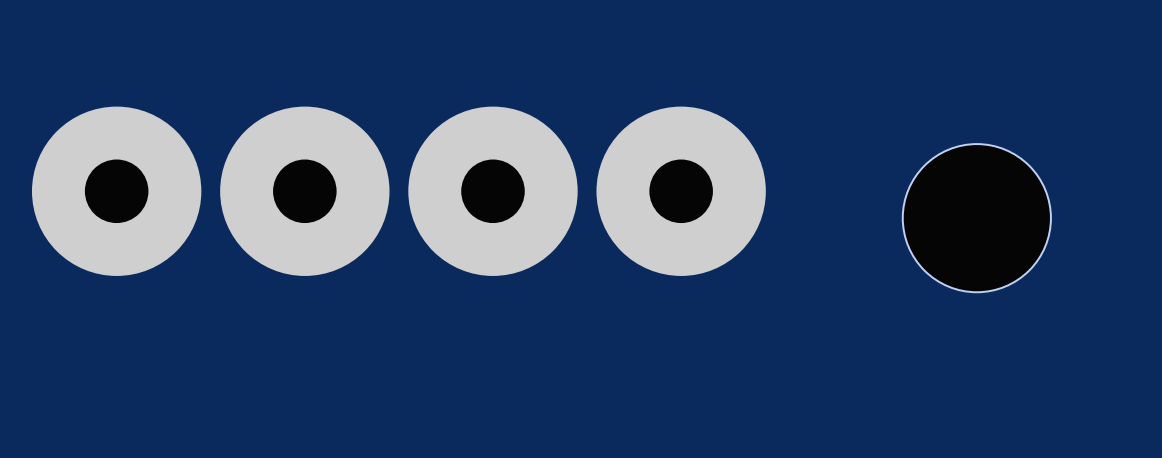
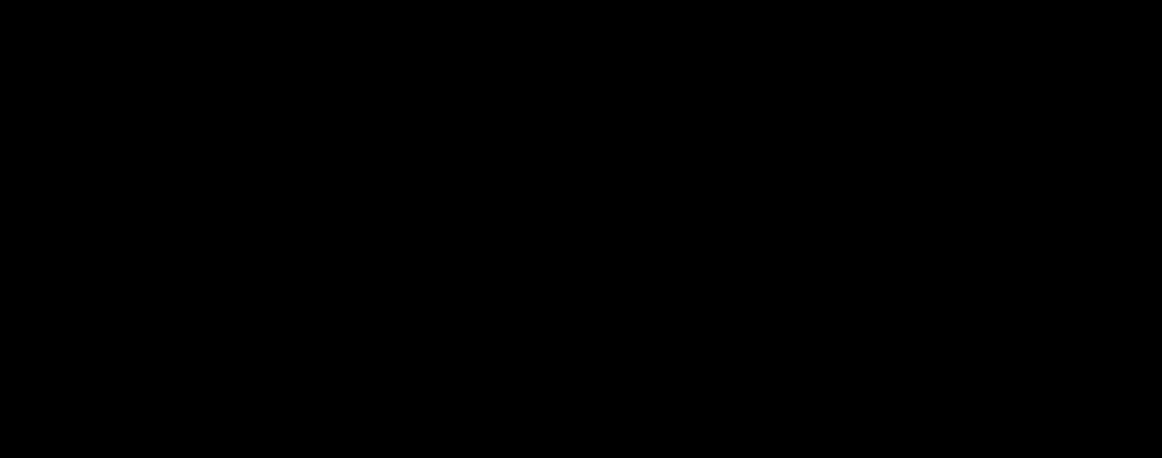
part: (116, 191) -> none
part: (304, 191) -> none
part: (492, 191) -> none
part: (681, 191) -> none
part: (976, 218) -> none

